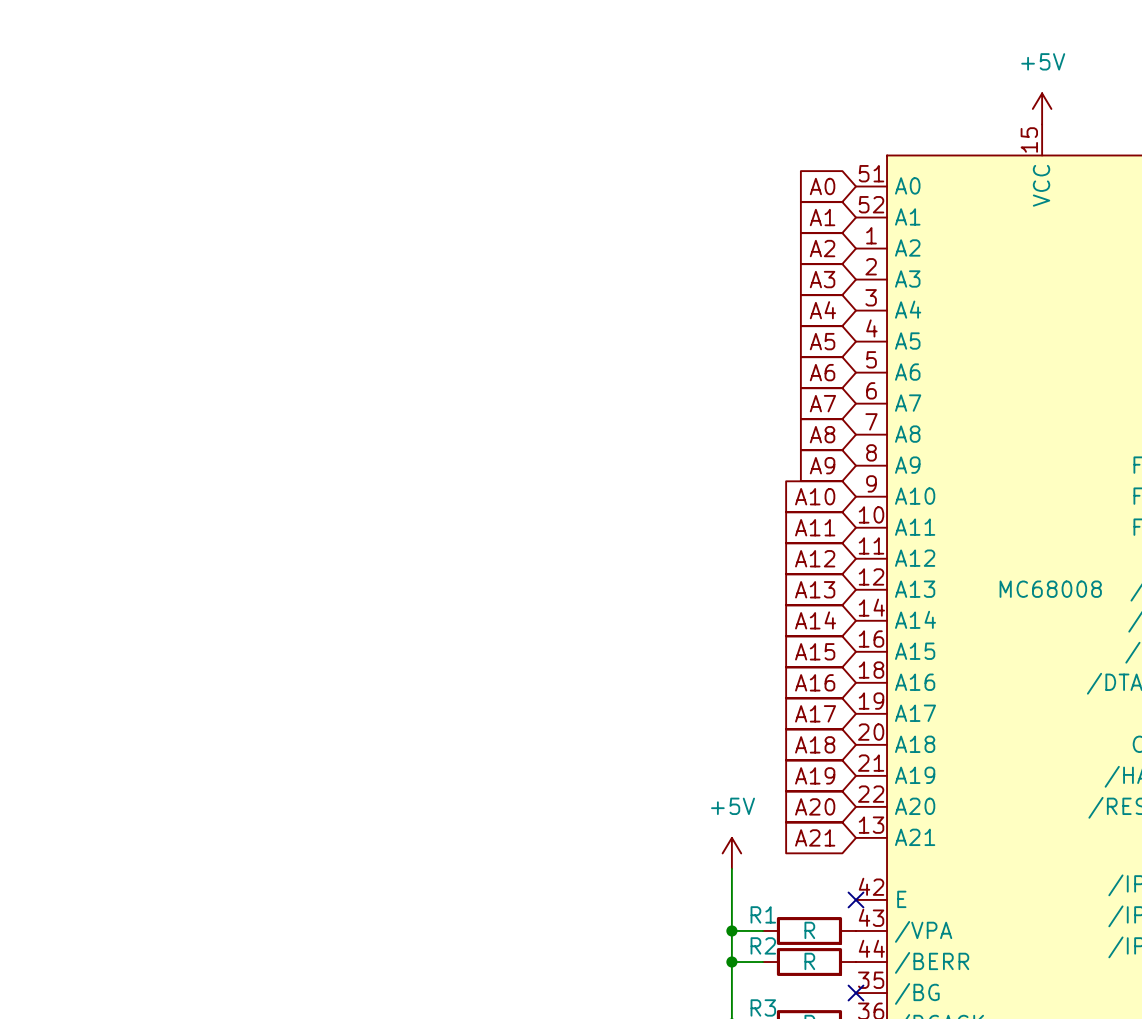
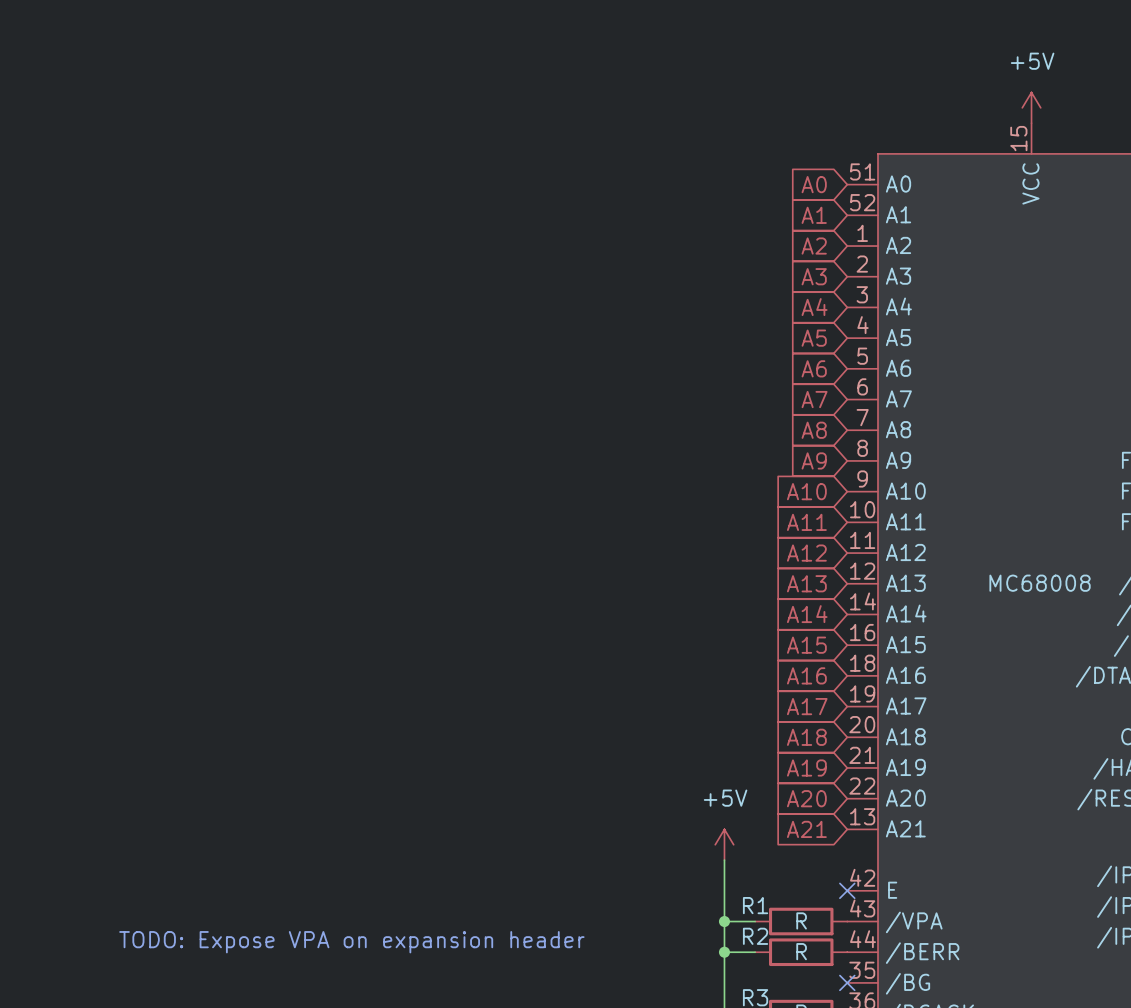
text: none -> TODO: Expose VPA on expansion header (351, 942)

